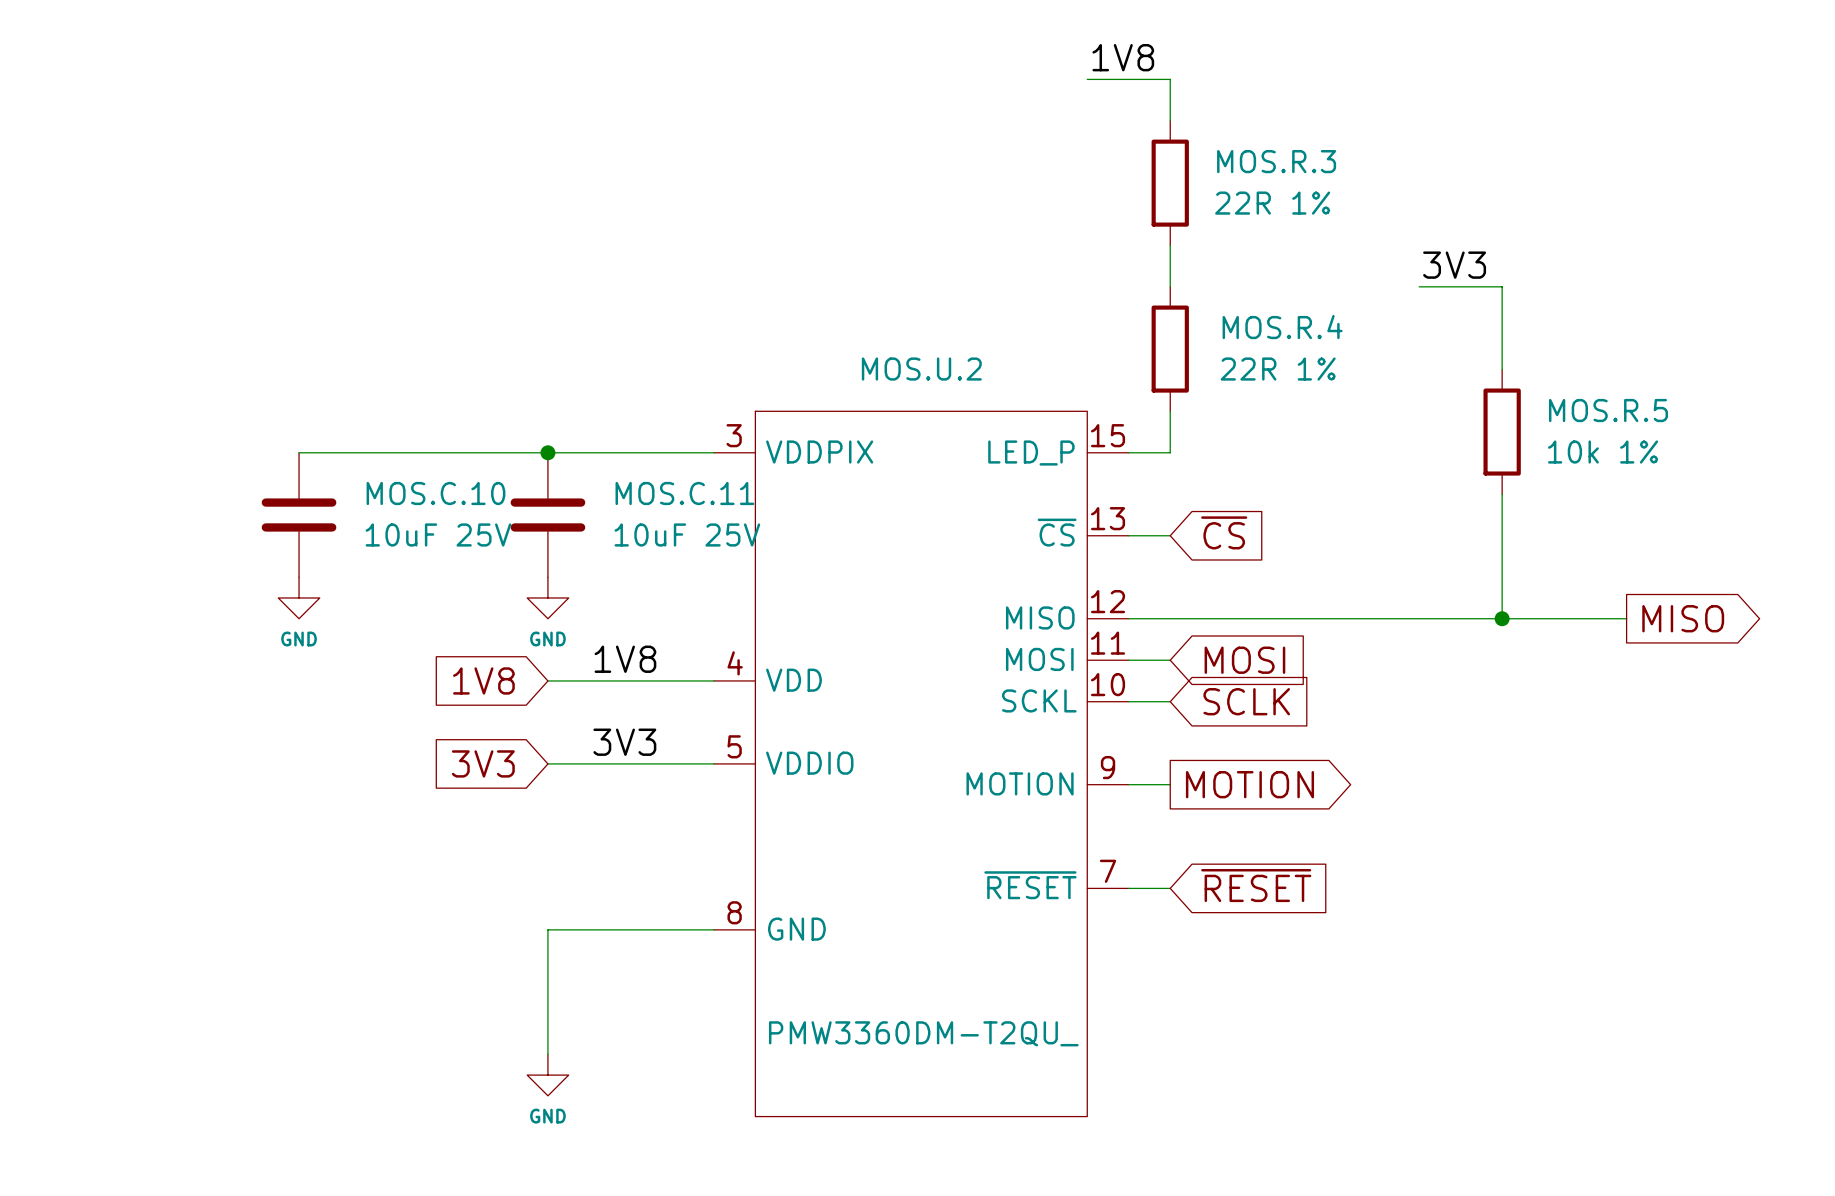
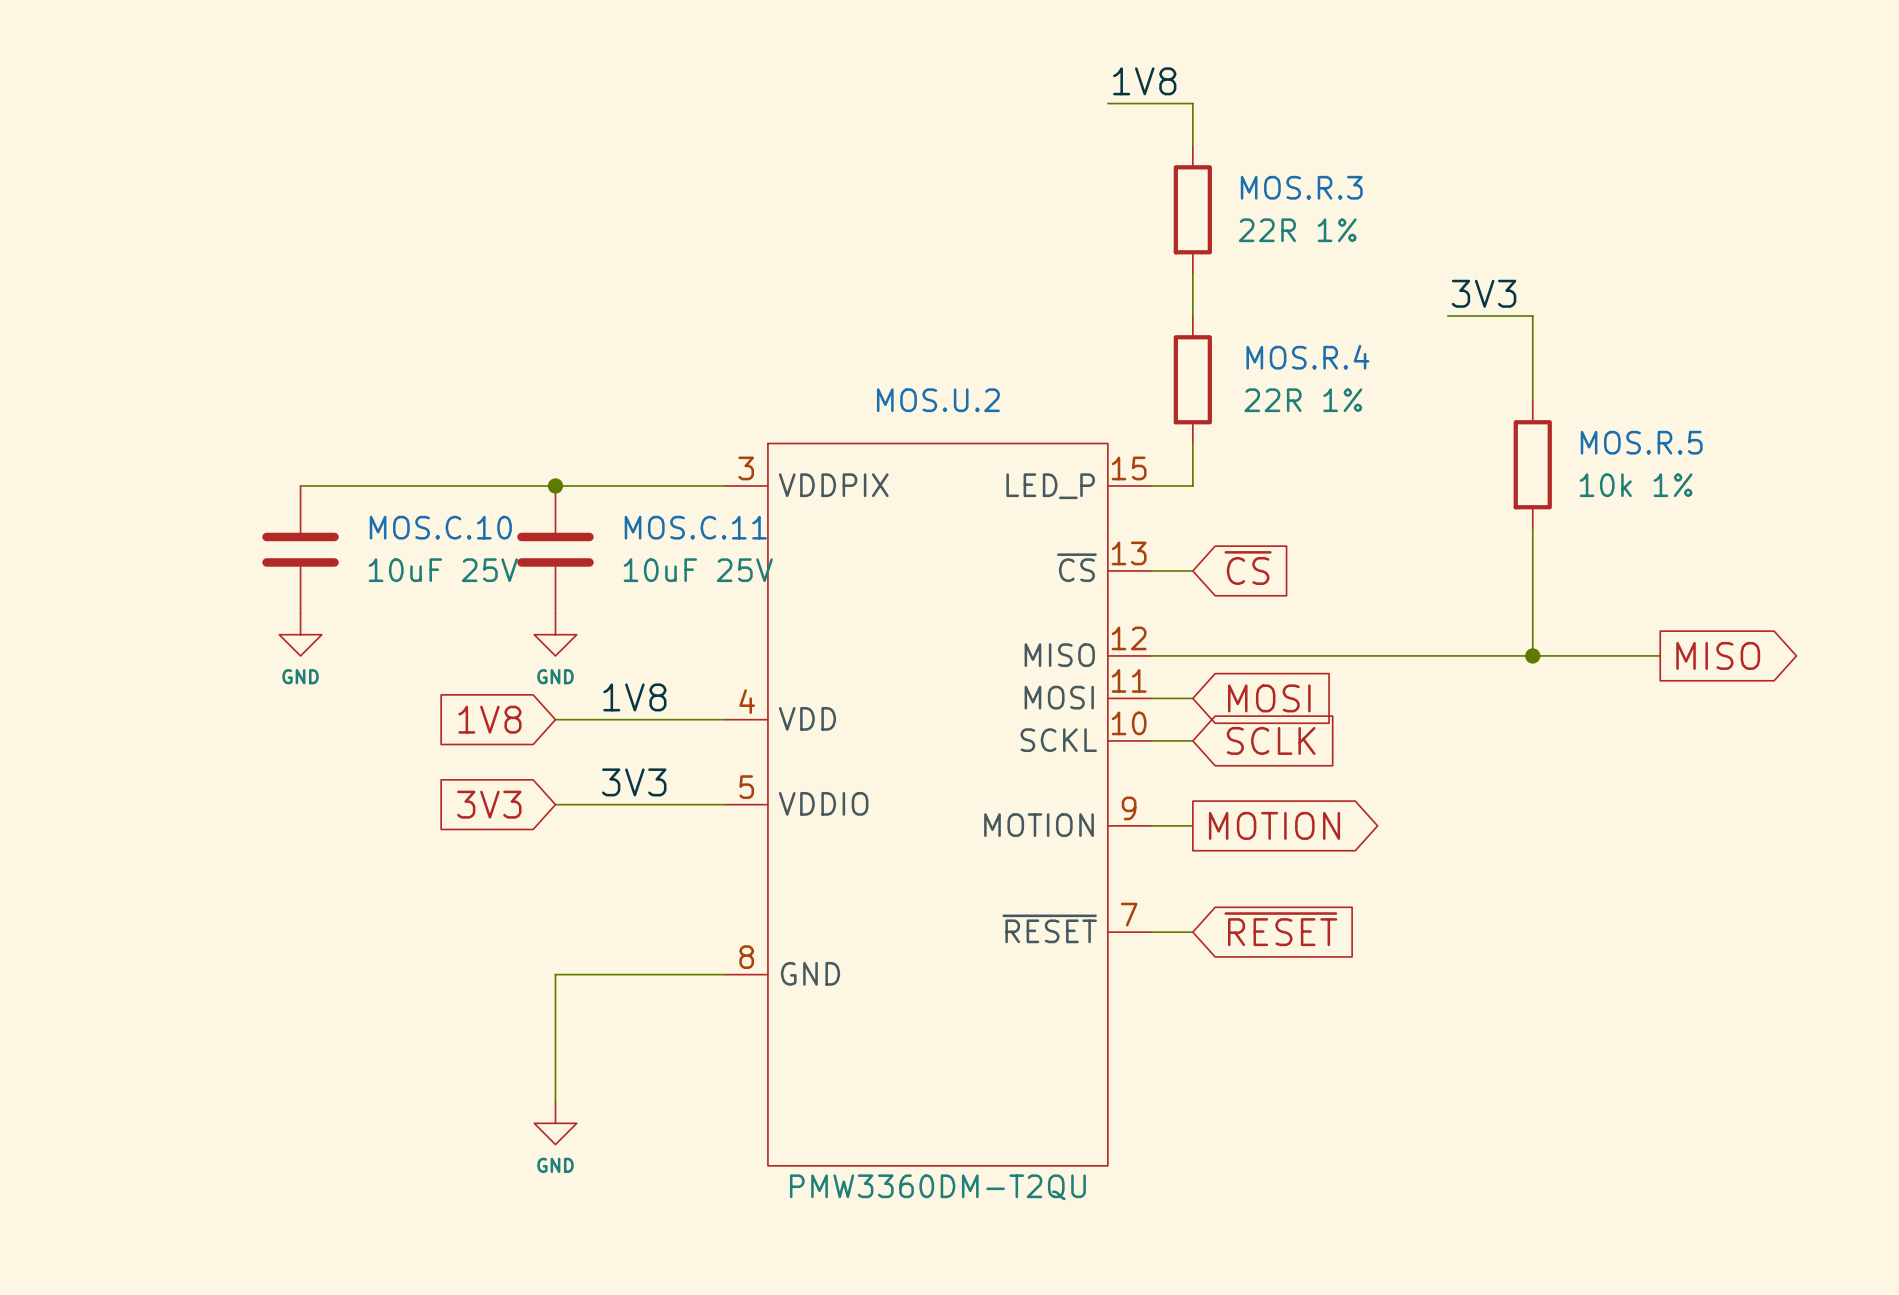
MOS.U.2 value: PMW3360DM-T2QU_ (923, 1033) -> PMW3360DM-T2QU (937, 1187)

